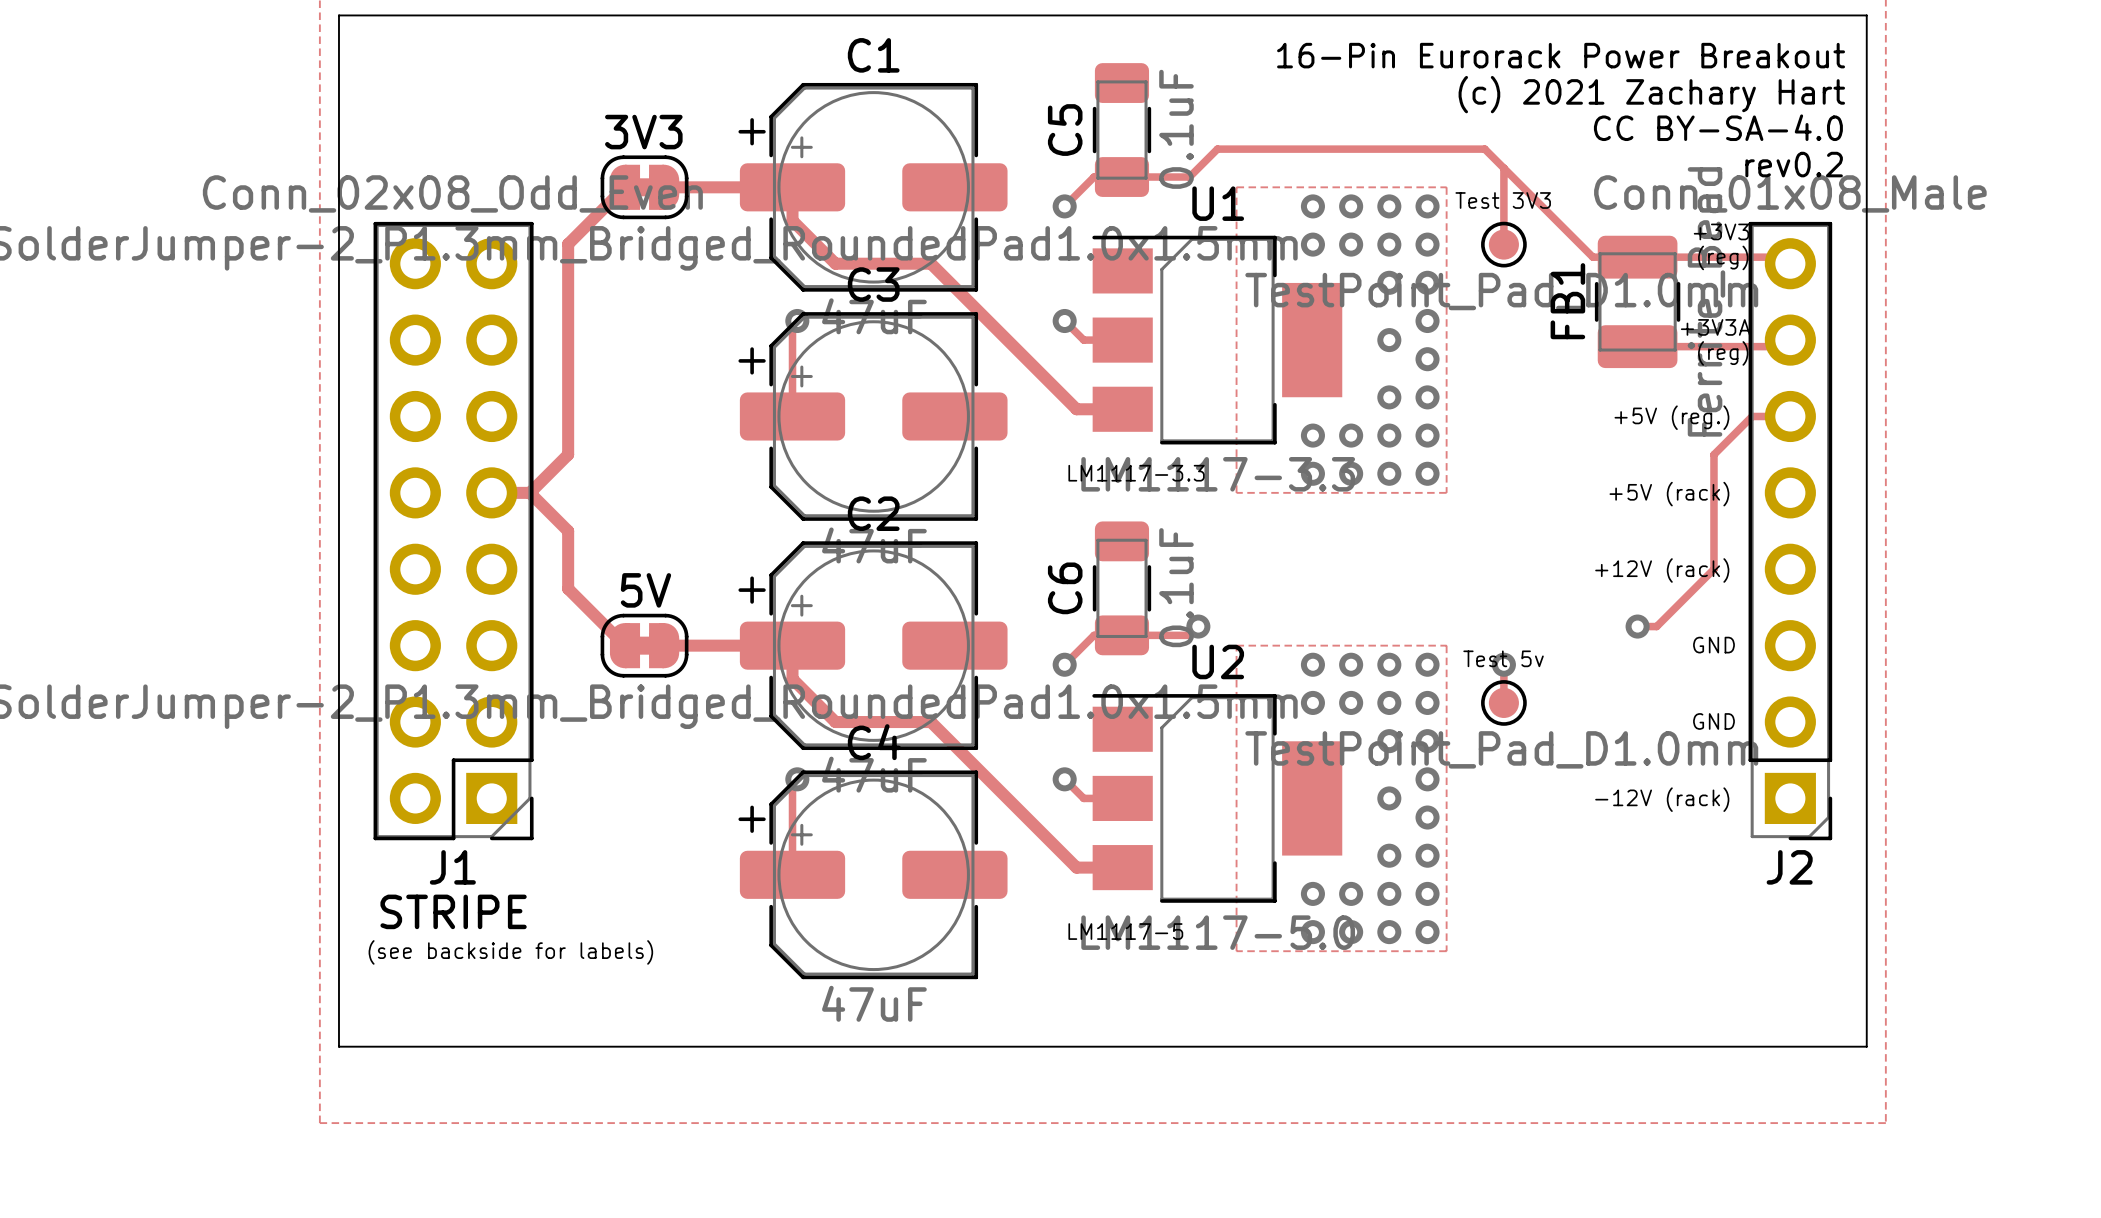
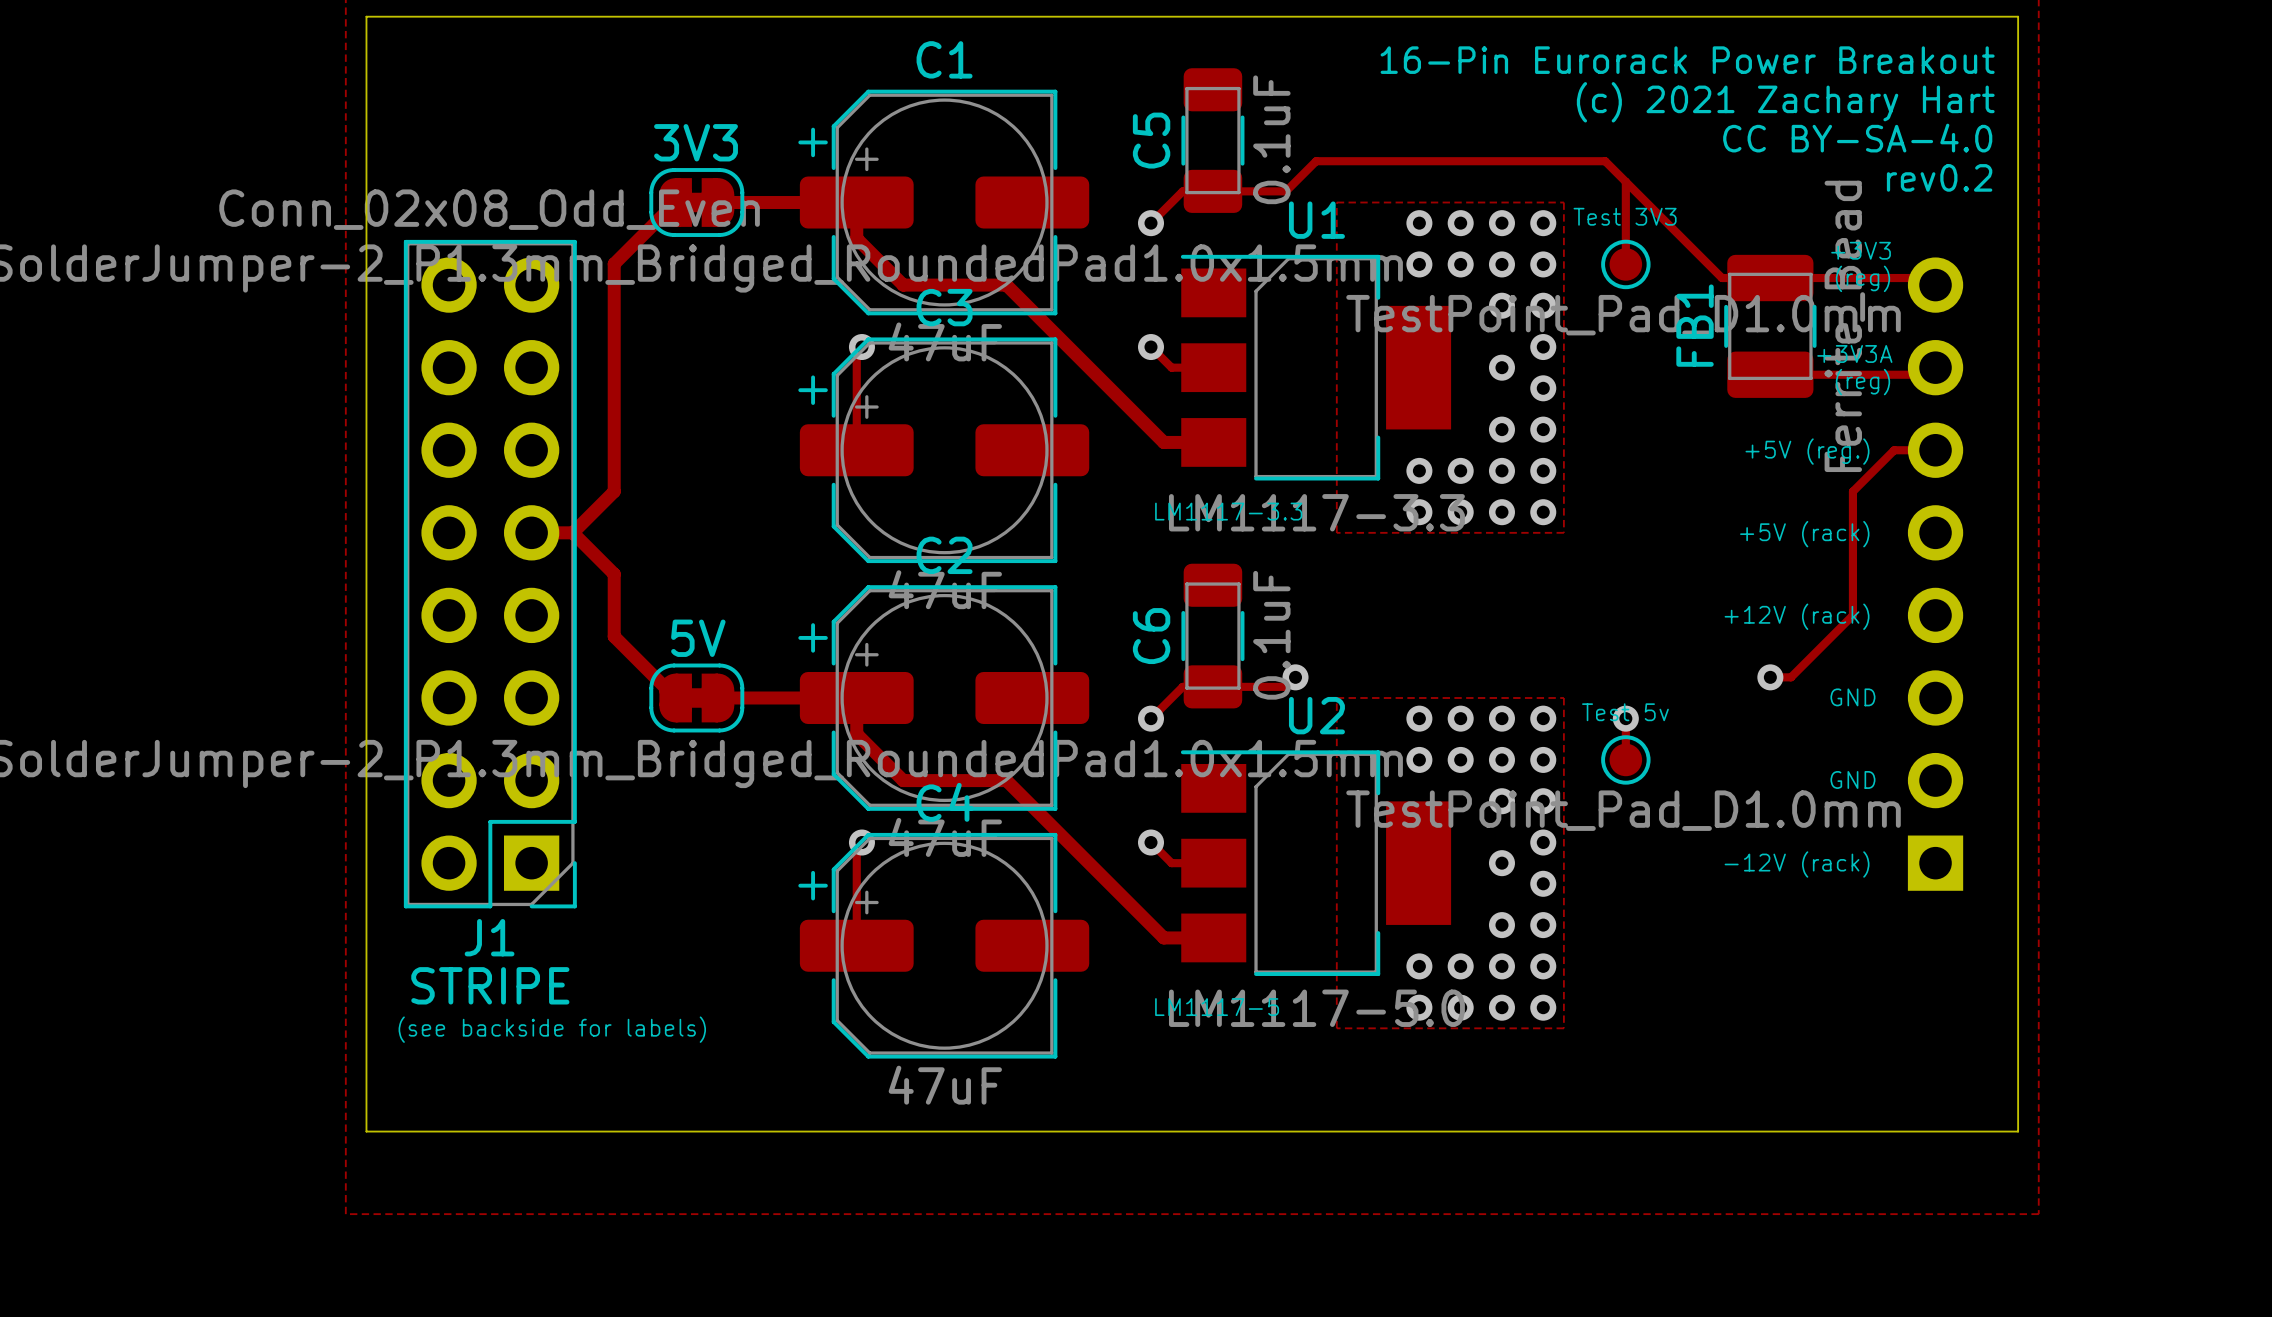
J2 side: top (1790, 531) -> bottom (1935, 574)

